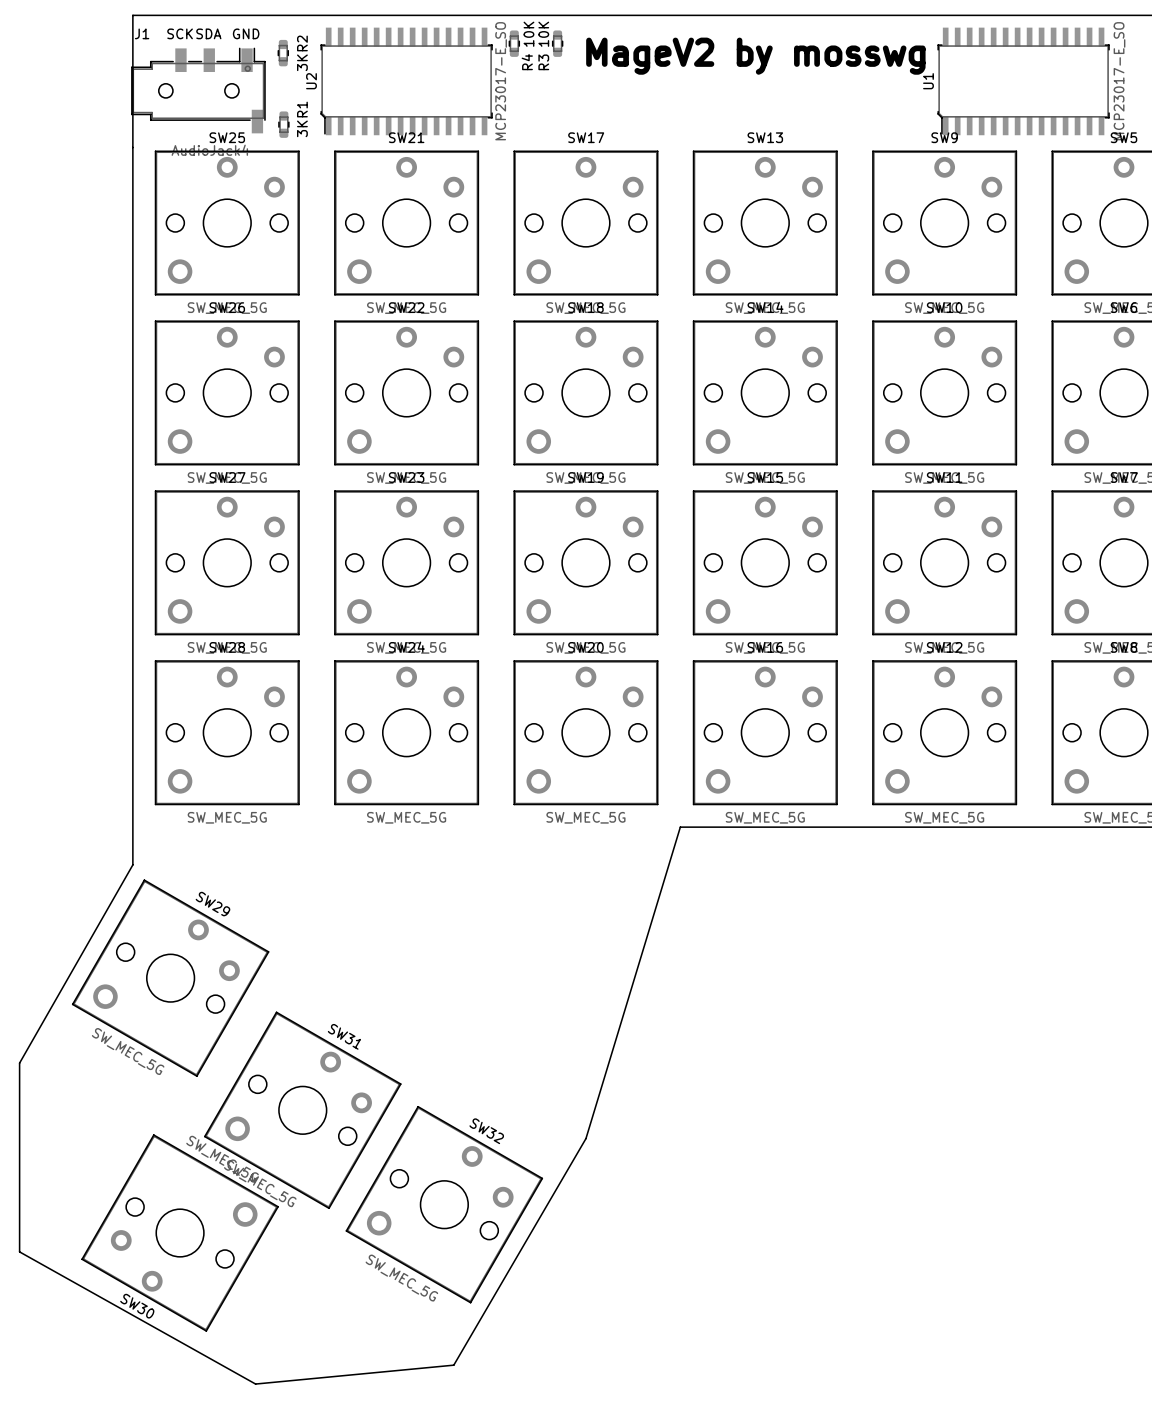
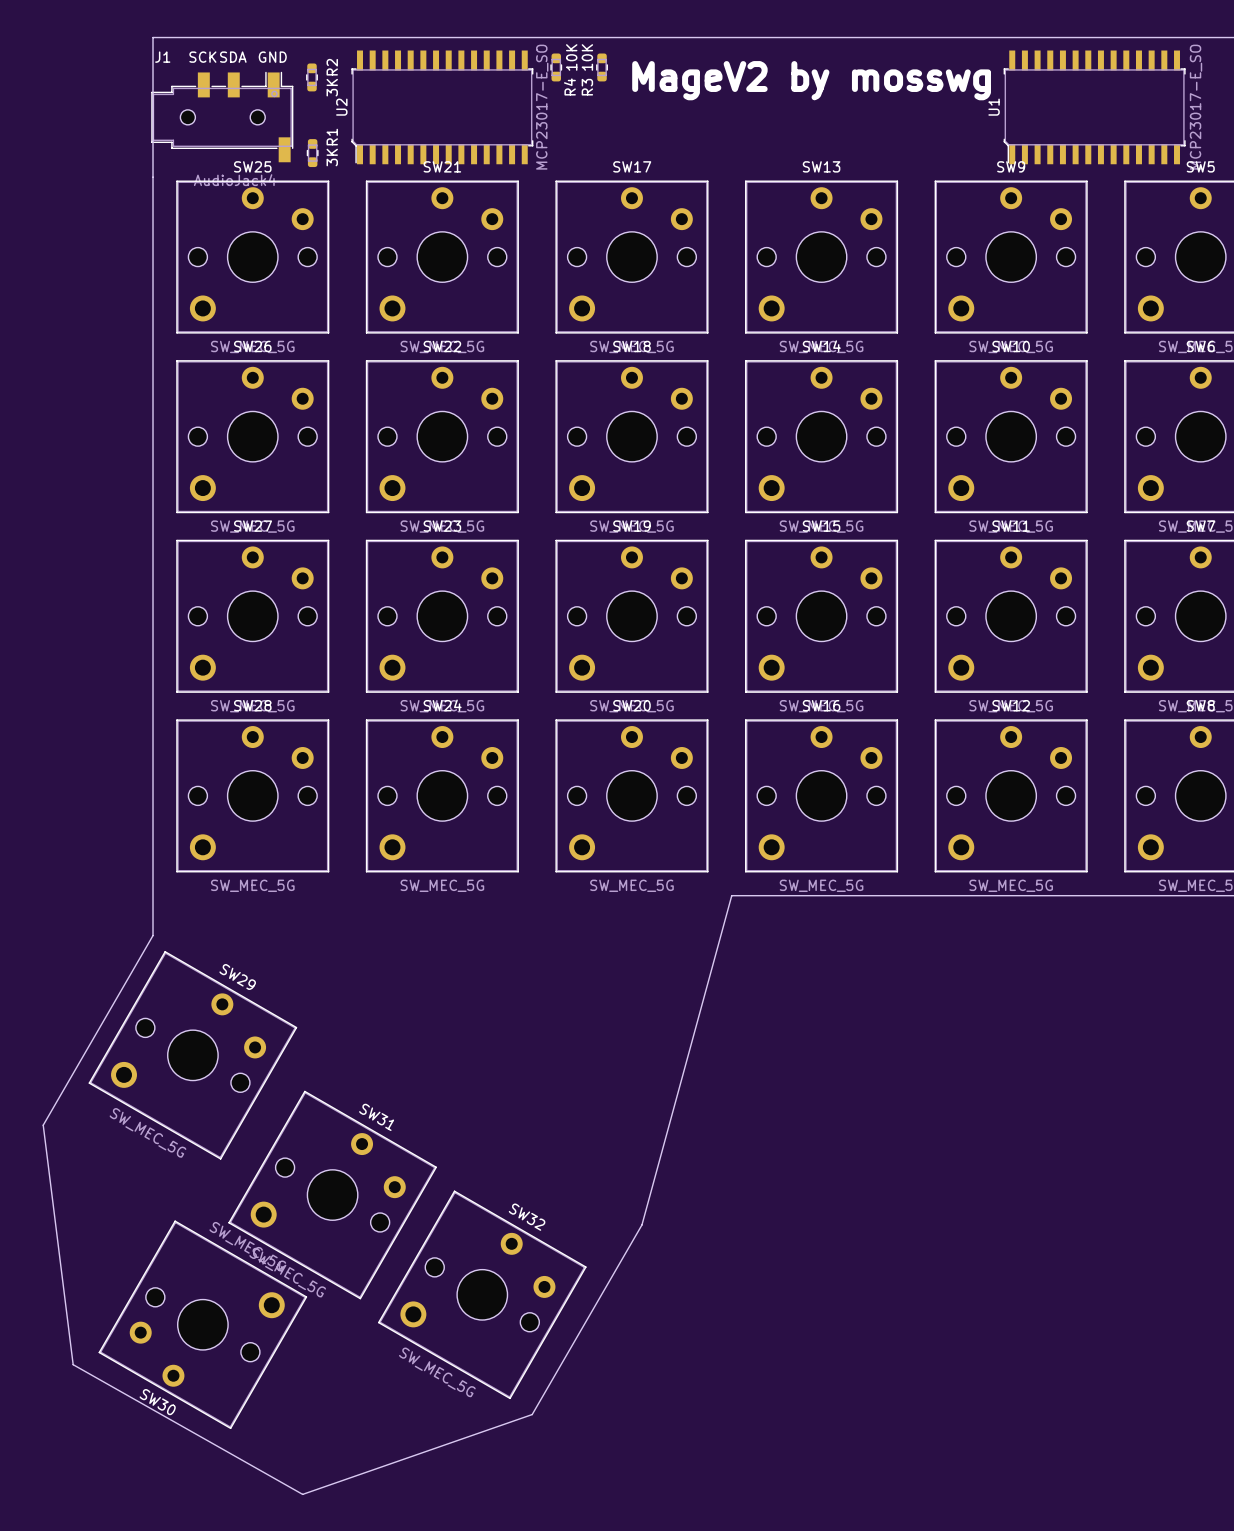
board edge: (680, 827) (585, 1138) (453, 1365) (255, 1384) (19, 1251) (19, 1063) (132, 864) -> (731, 895) (641, 1224) (532, 1414) (302, 1494) (73, 1364) (43, 1125) (153, 935)

